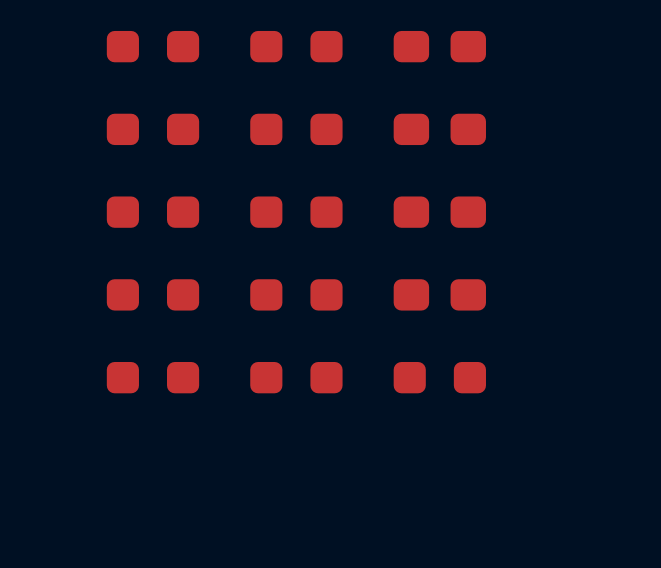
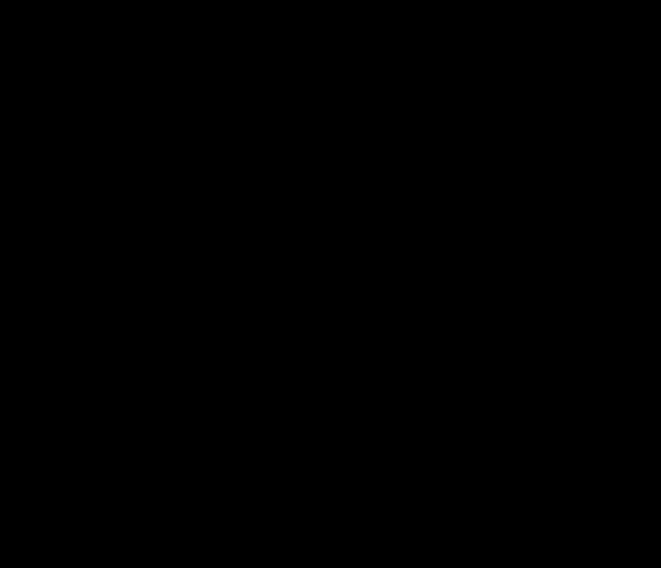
part: (152, 46) -> none
part: (296, 46) -> none
part: (439, 46) -> none
part: (152, 129) -> none
part: (296, 129) -> none
part: (439, 129) -> none
part: (152, 212) -> none
part: (296, 212) -> none
part: (439, 212) -> none
part: (152, 294) -> none
part: (296, 294) -> none
part: (439, 294) -> none
part: (152, 377) -> none
part: (296, 377) -> none
part: (439, 377) -> none

